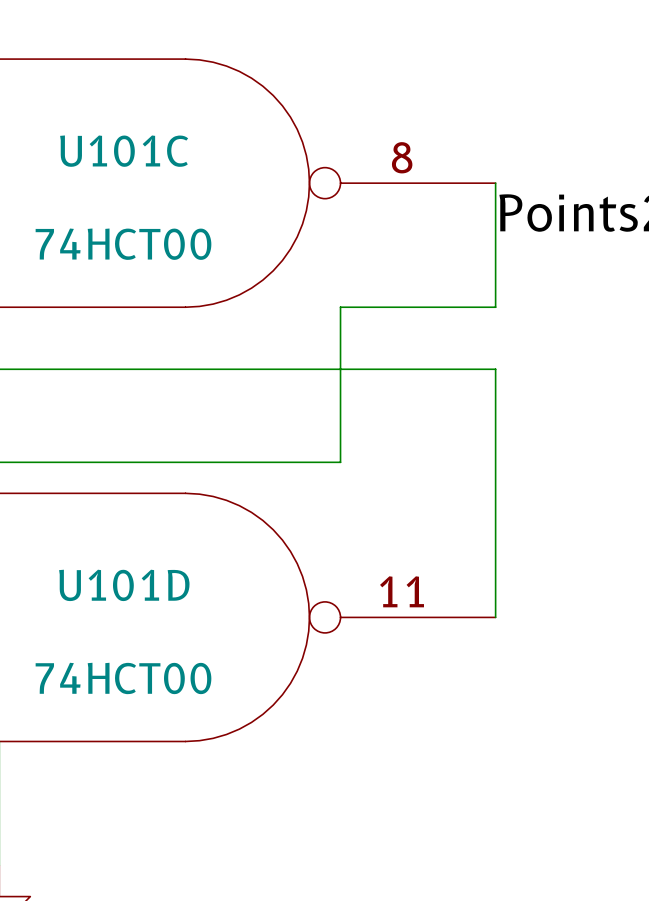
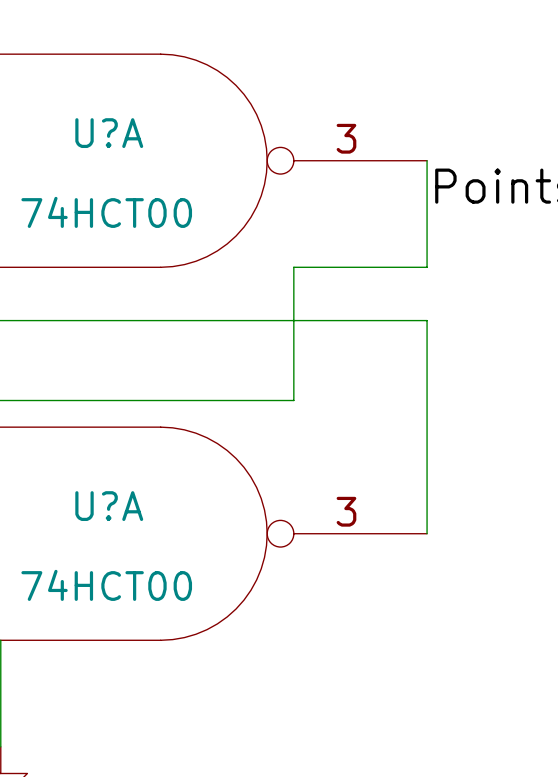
U101C name: U101C (124, 151) -> U?A (109, 133)
U101C pin number: 8 (402, 157) -> 3 (346, 138)
U101D name: U101D (124, 585) -> U?A (109, 506)
U101D pin number: 11 (402, 591) -> 3 (346, 511)

